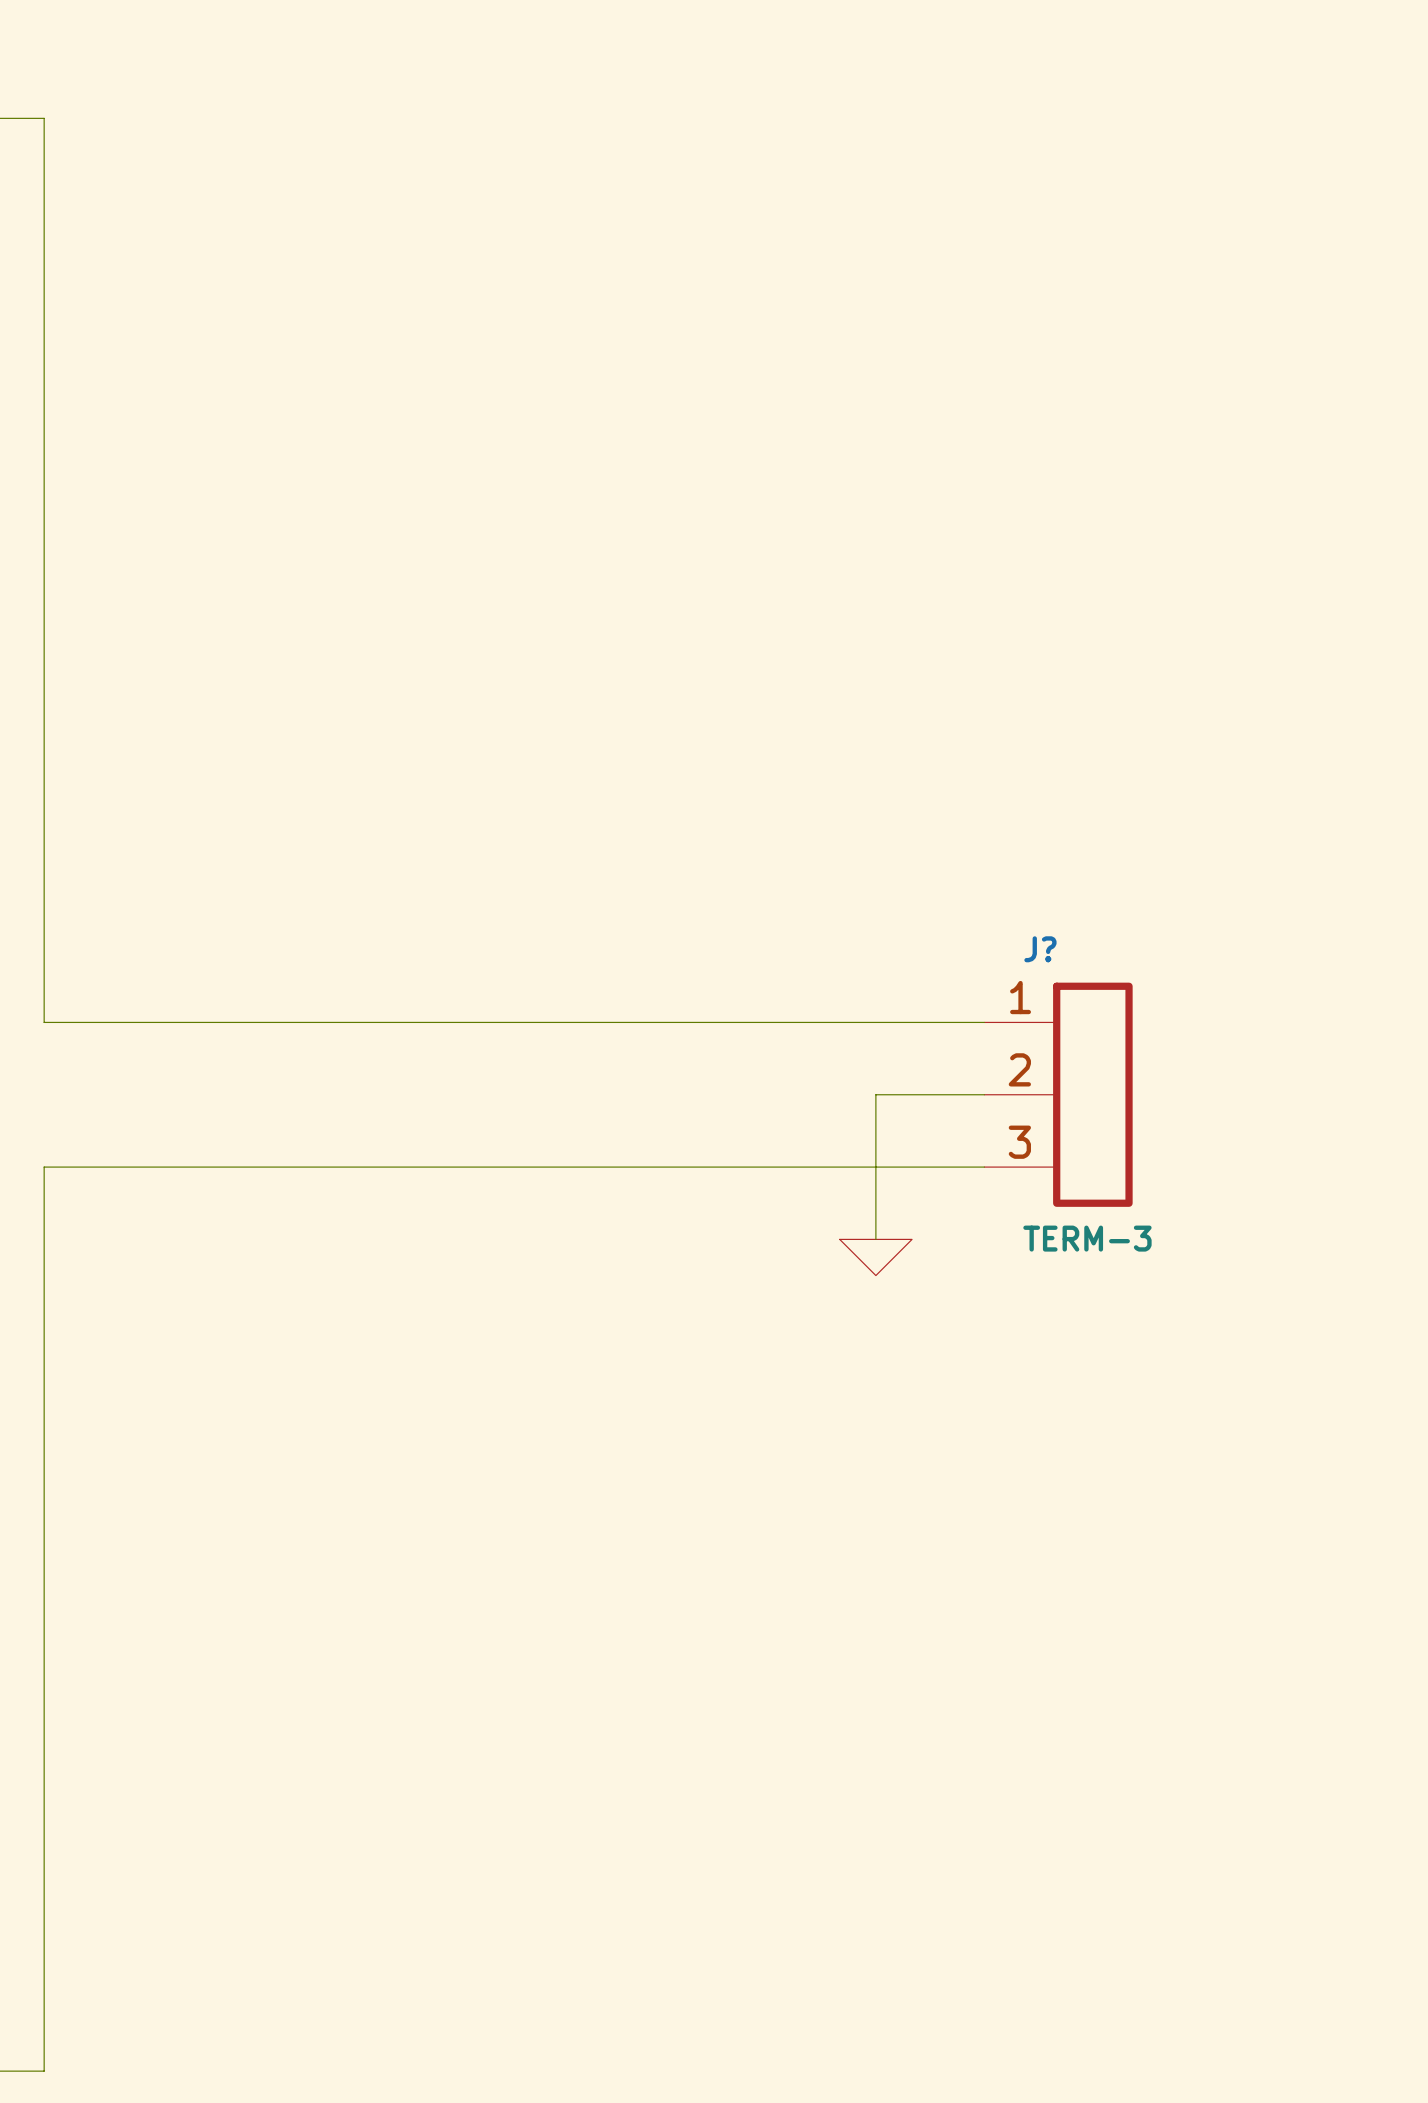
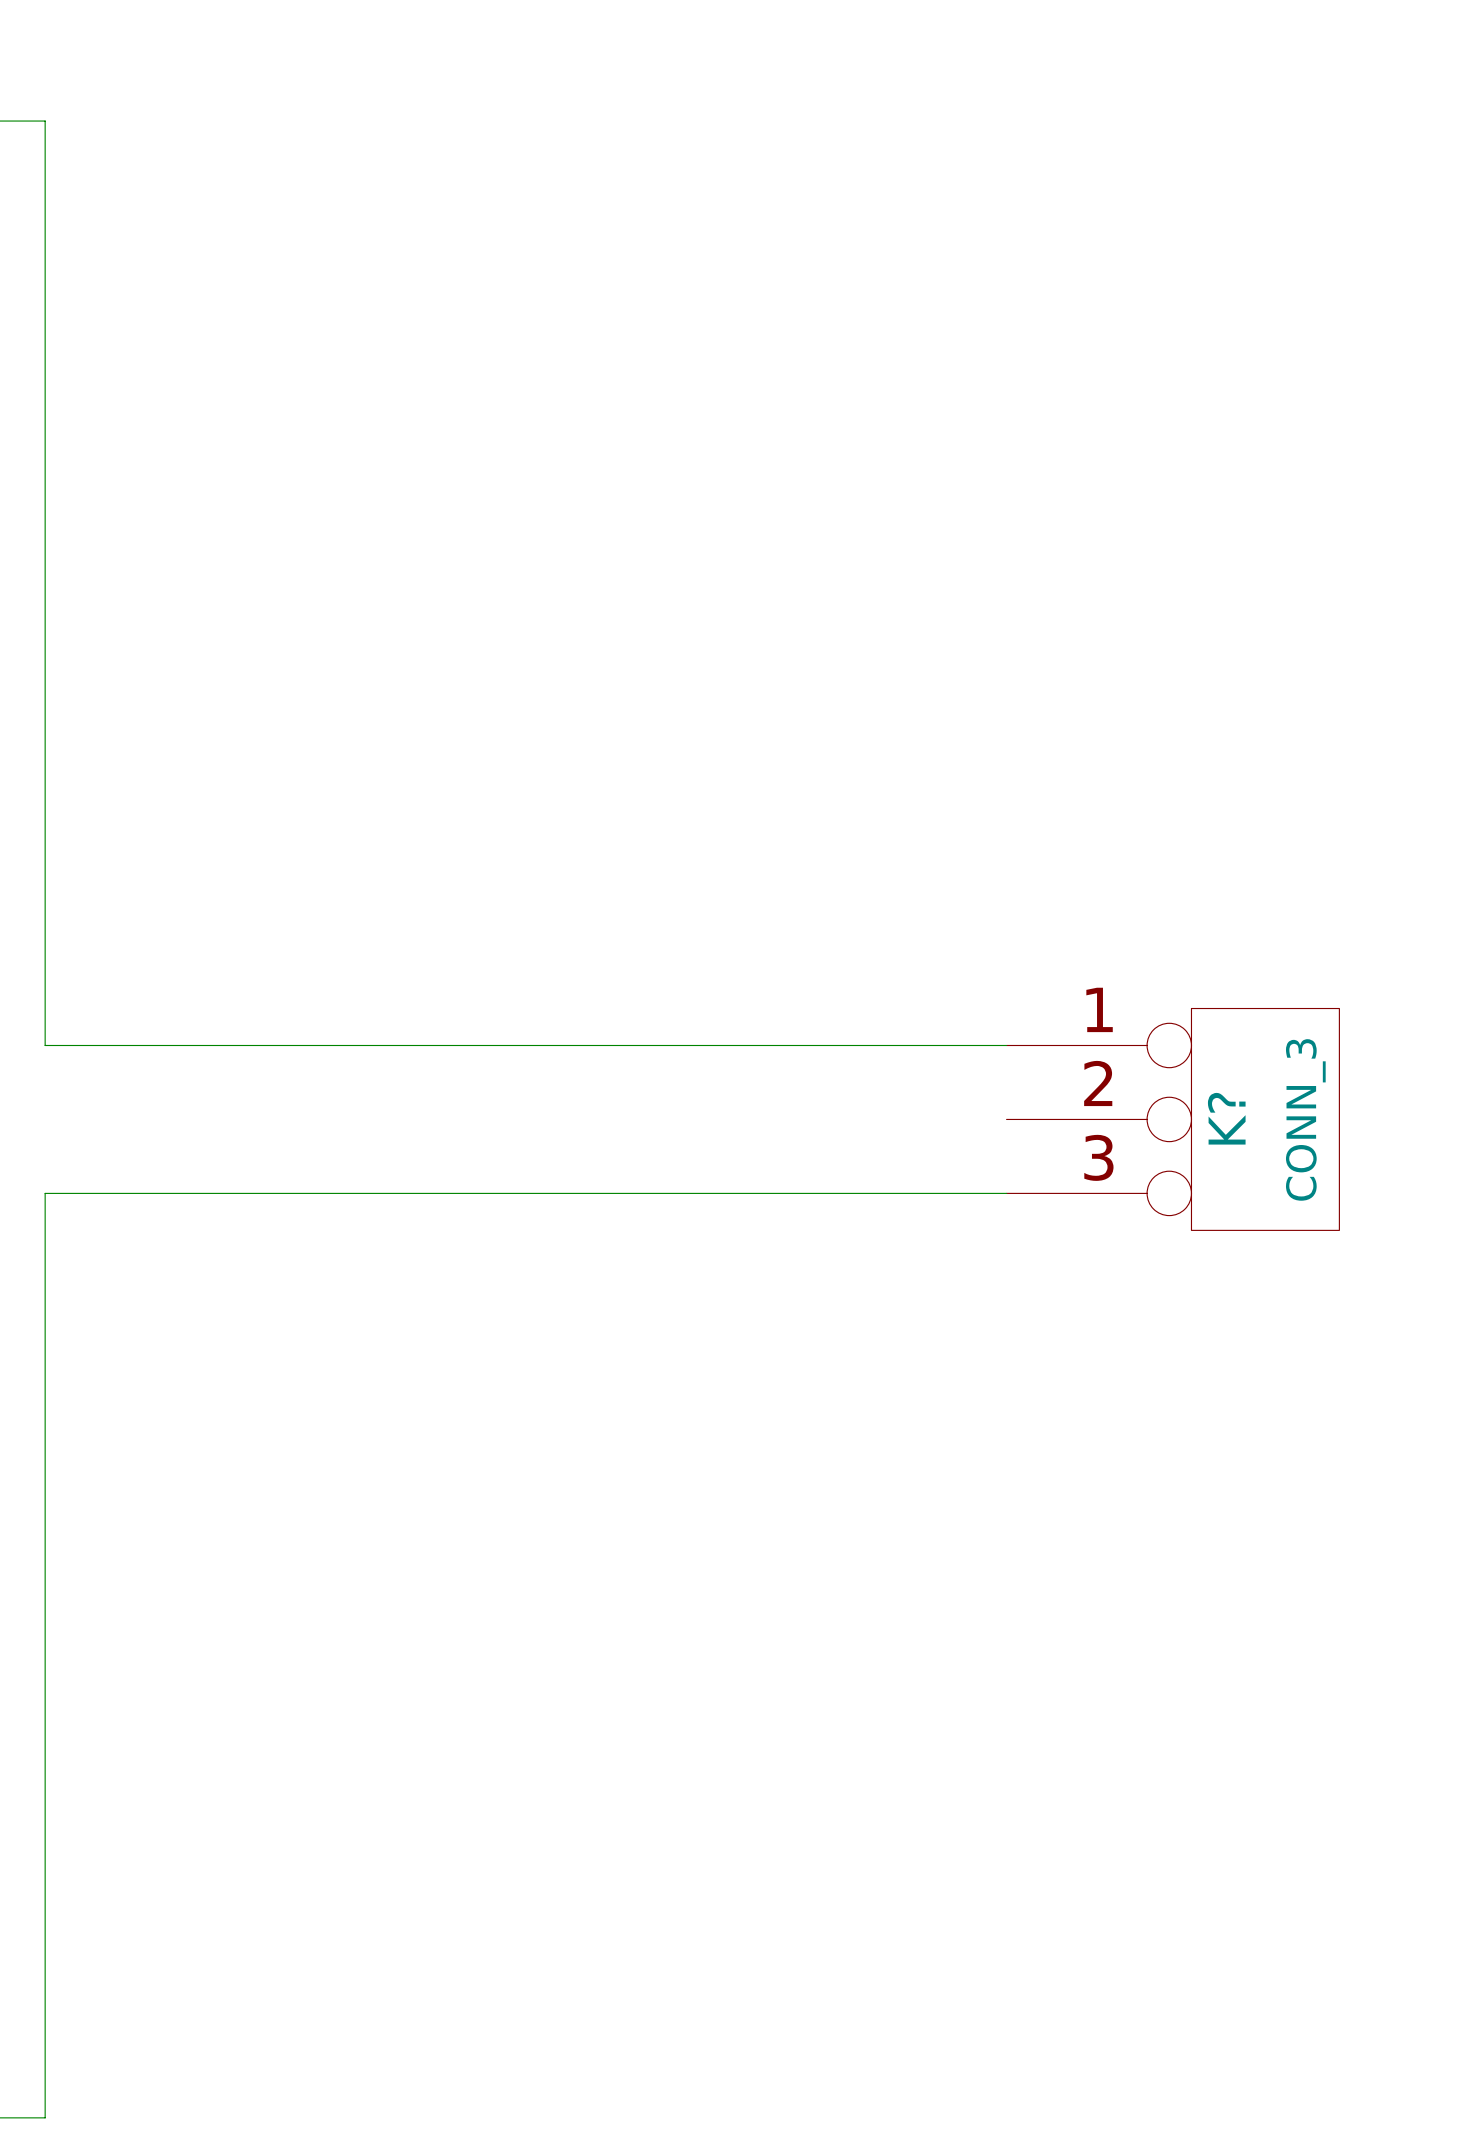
wire: (984, 1094) (875, 1094) (875, 1239) -> none
J?: TERM-3 (1058, 1094) -> none
K?: none -> CONN_3 (1172, 1119)
power symbol: (875, 1257) -> none

